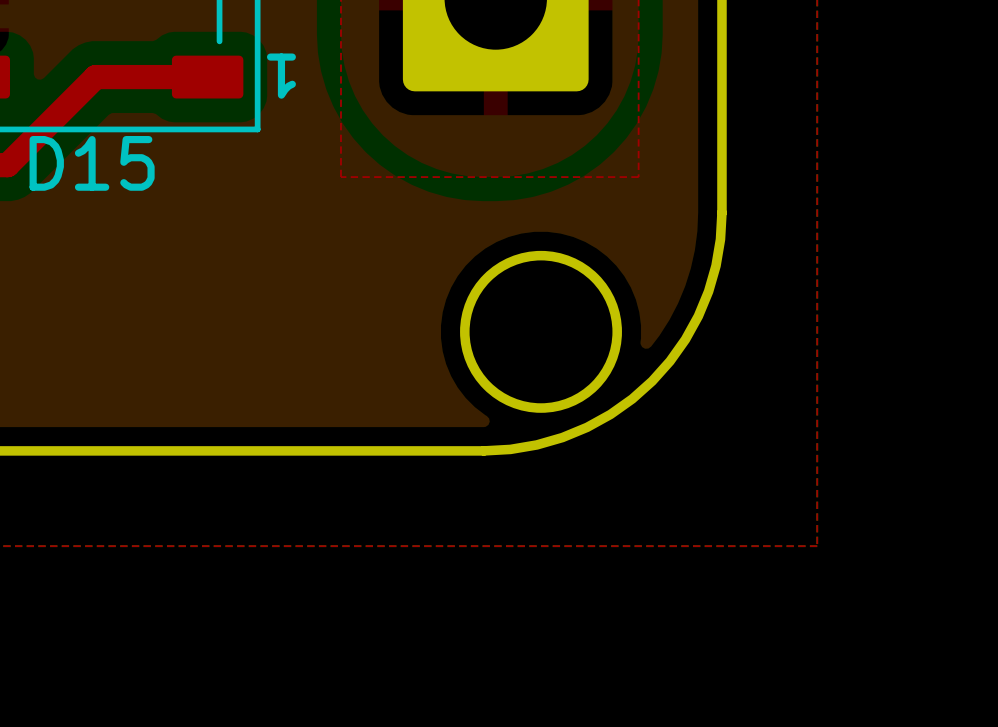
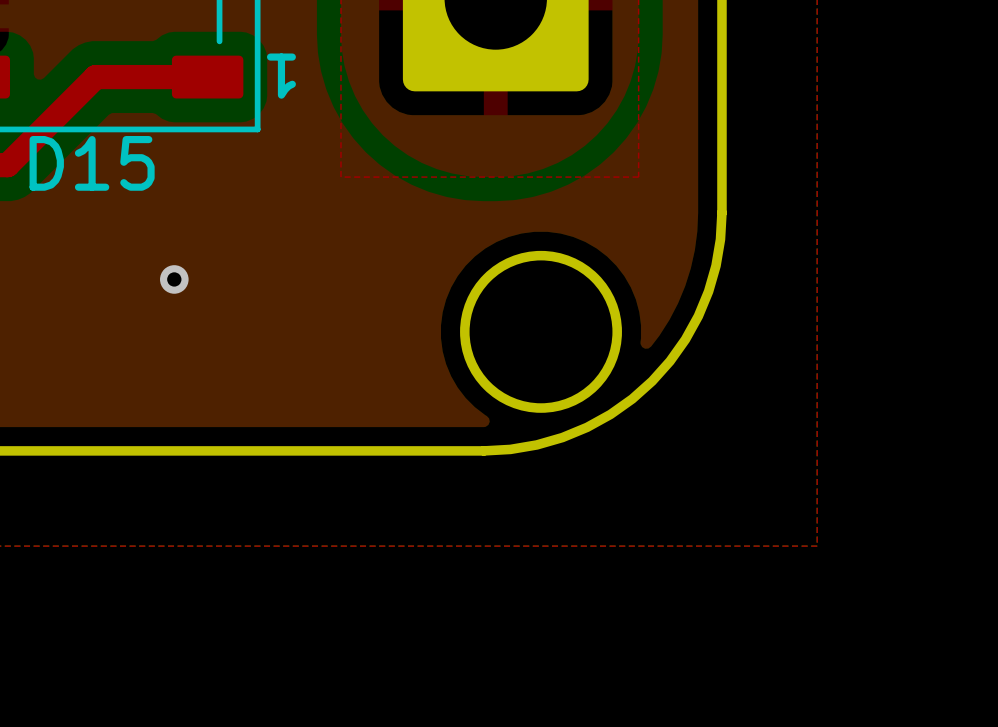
via: none -> (174, 279)

